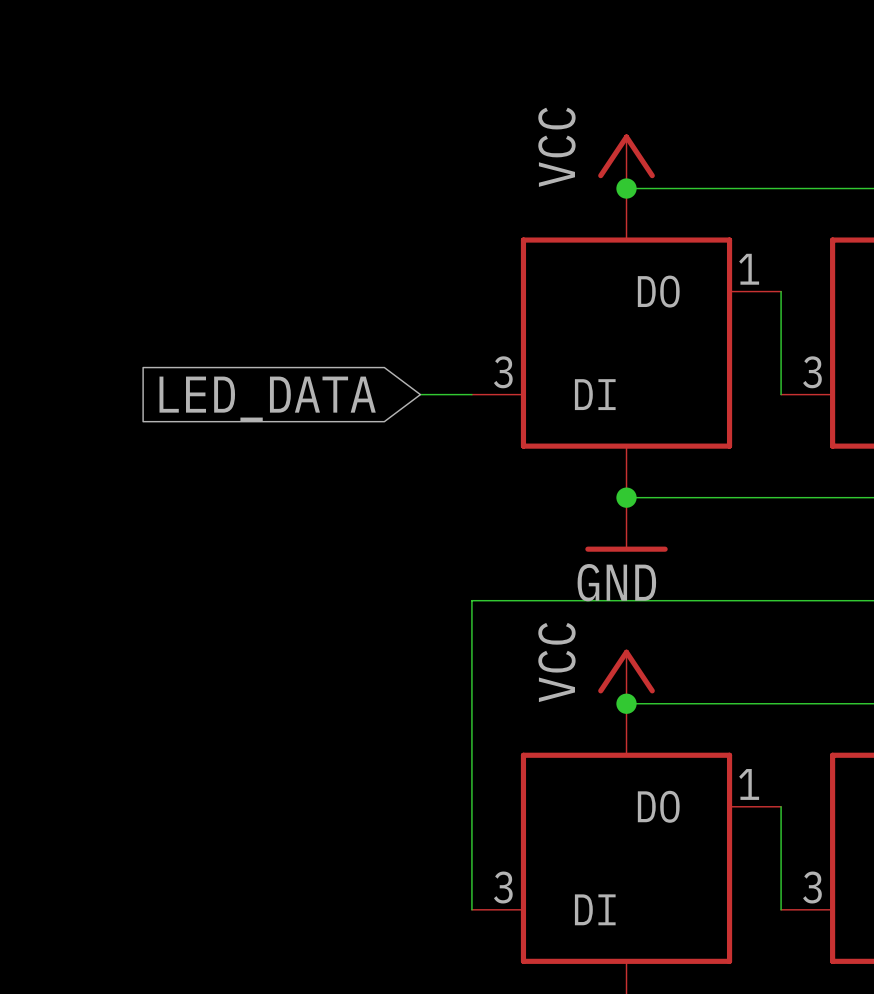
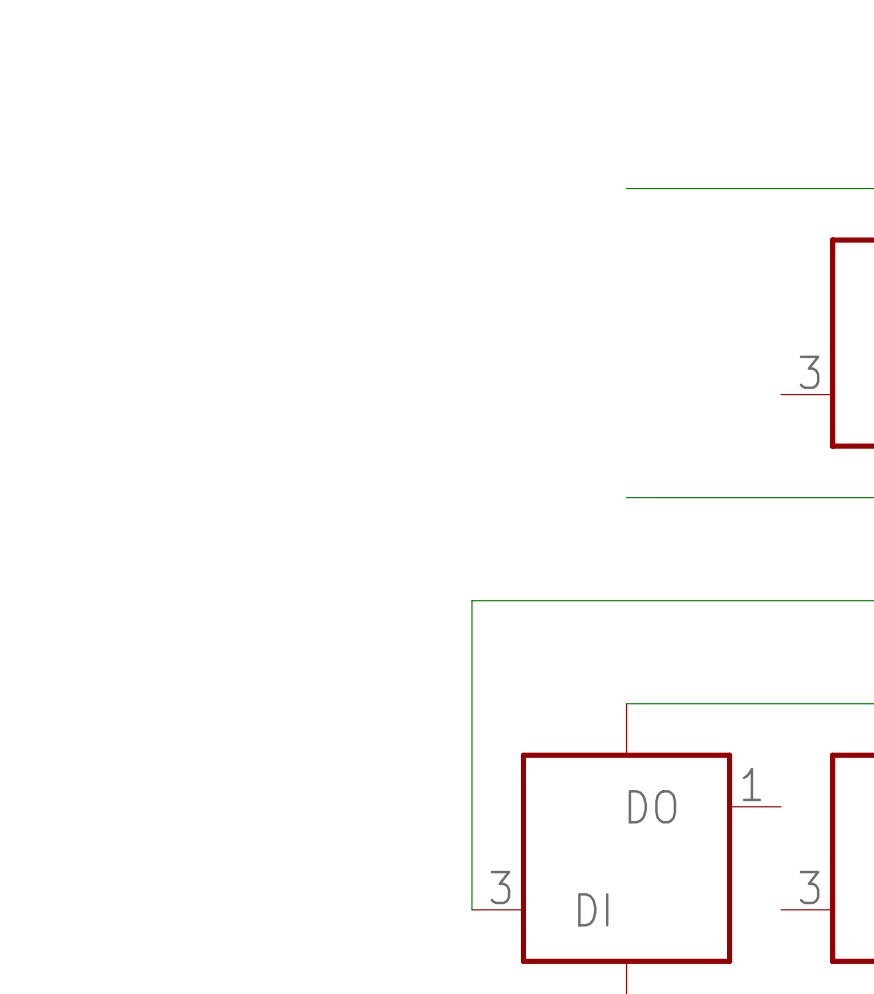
power symbol: VCC (626, 161) -> none
junction: (626, 188) -> none
wire: (781, 291) (781, 394) -> none
part: (626, 343) -> none
wire: (420, 394) (471, 394) -> none
global label: LED_DATA (267, 398) -> none
junction: (626, 497) -> none
power symbol: GND (626, 524) -> none
power symbol: VCC (626, 676) -> none
junction: (626, 703) -> none
wire: (781, 806) (781, 909) -> none

